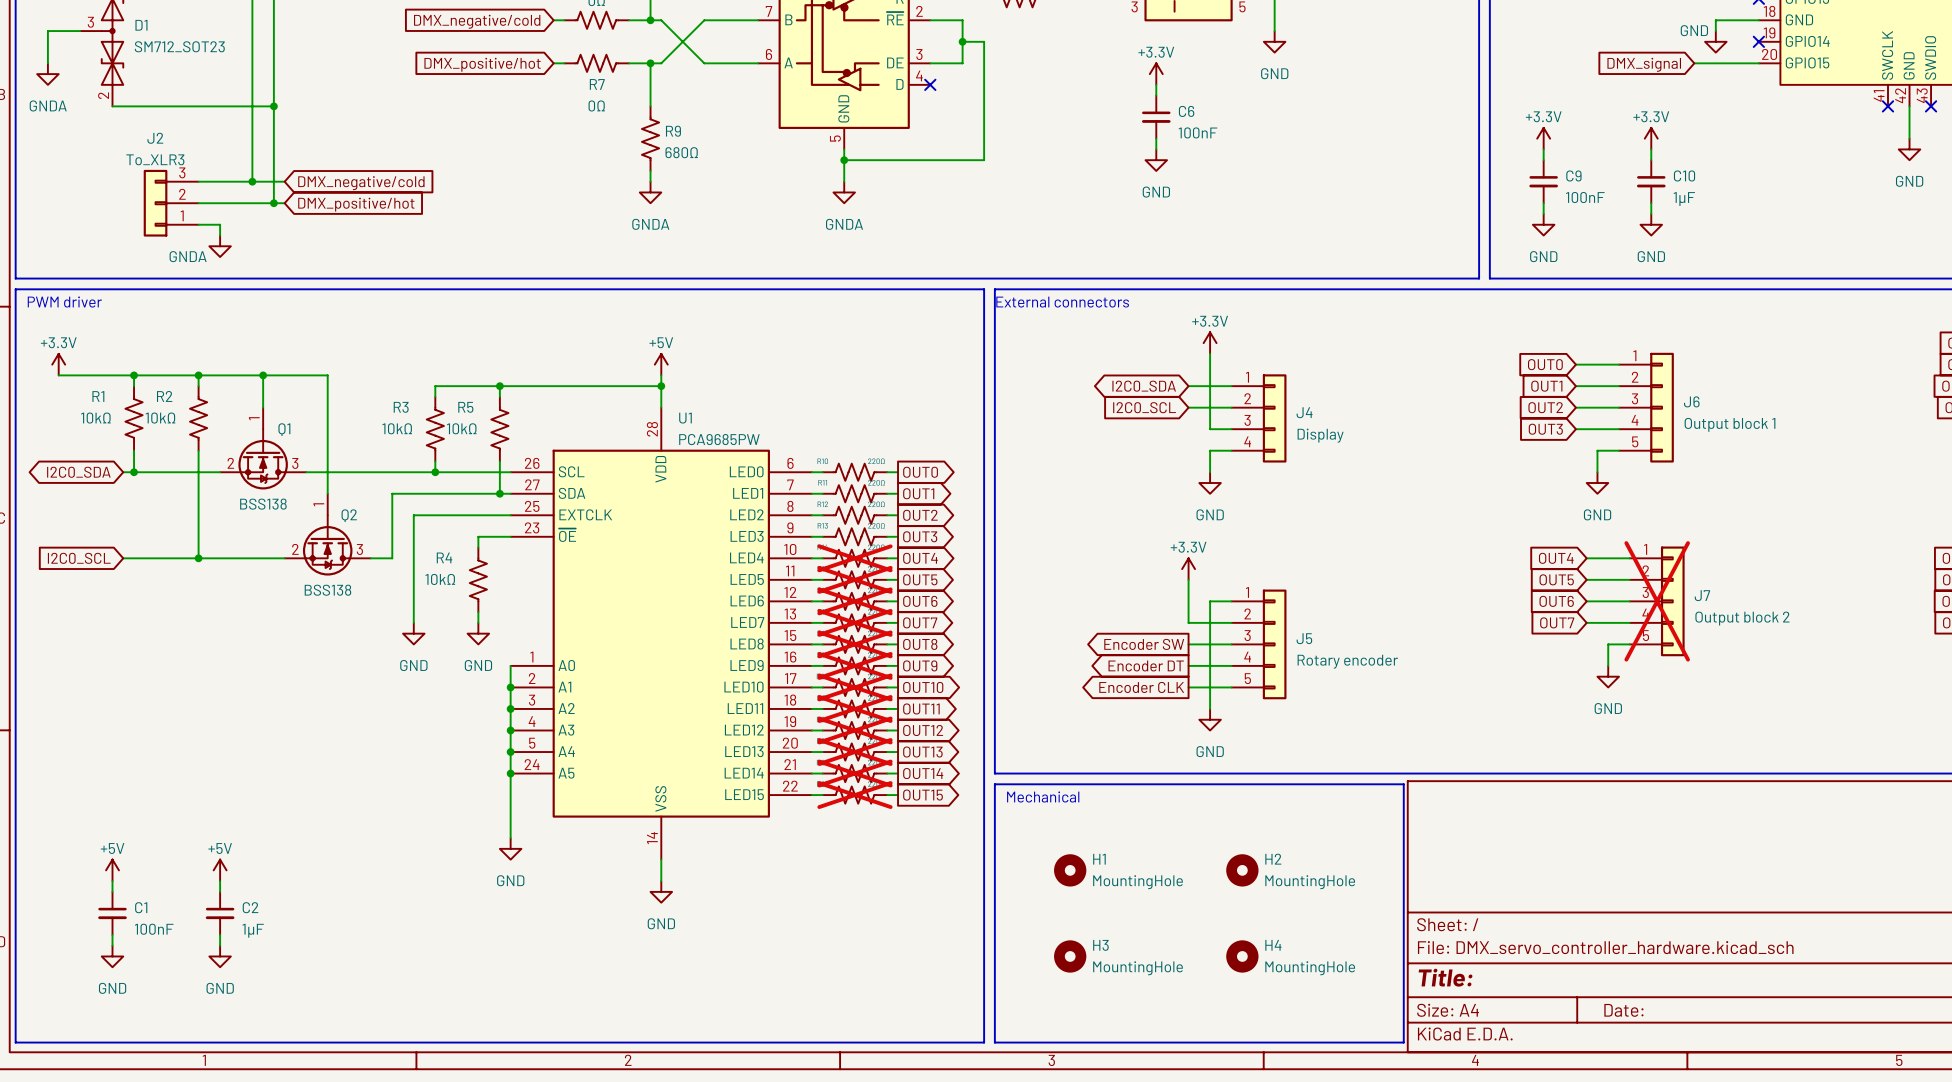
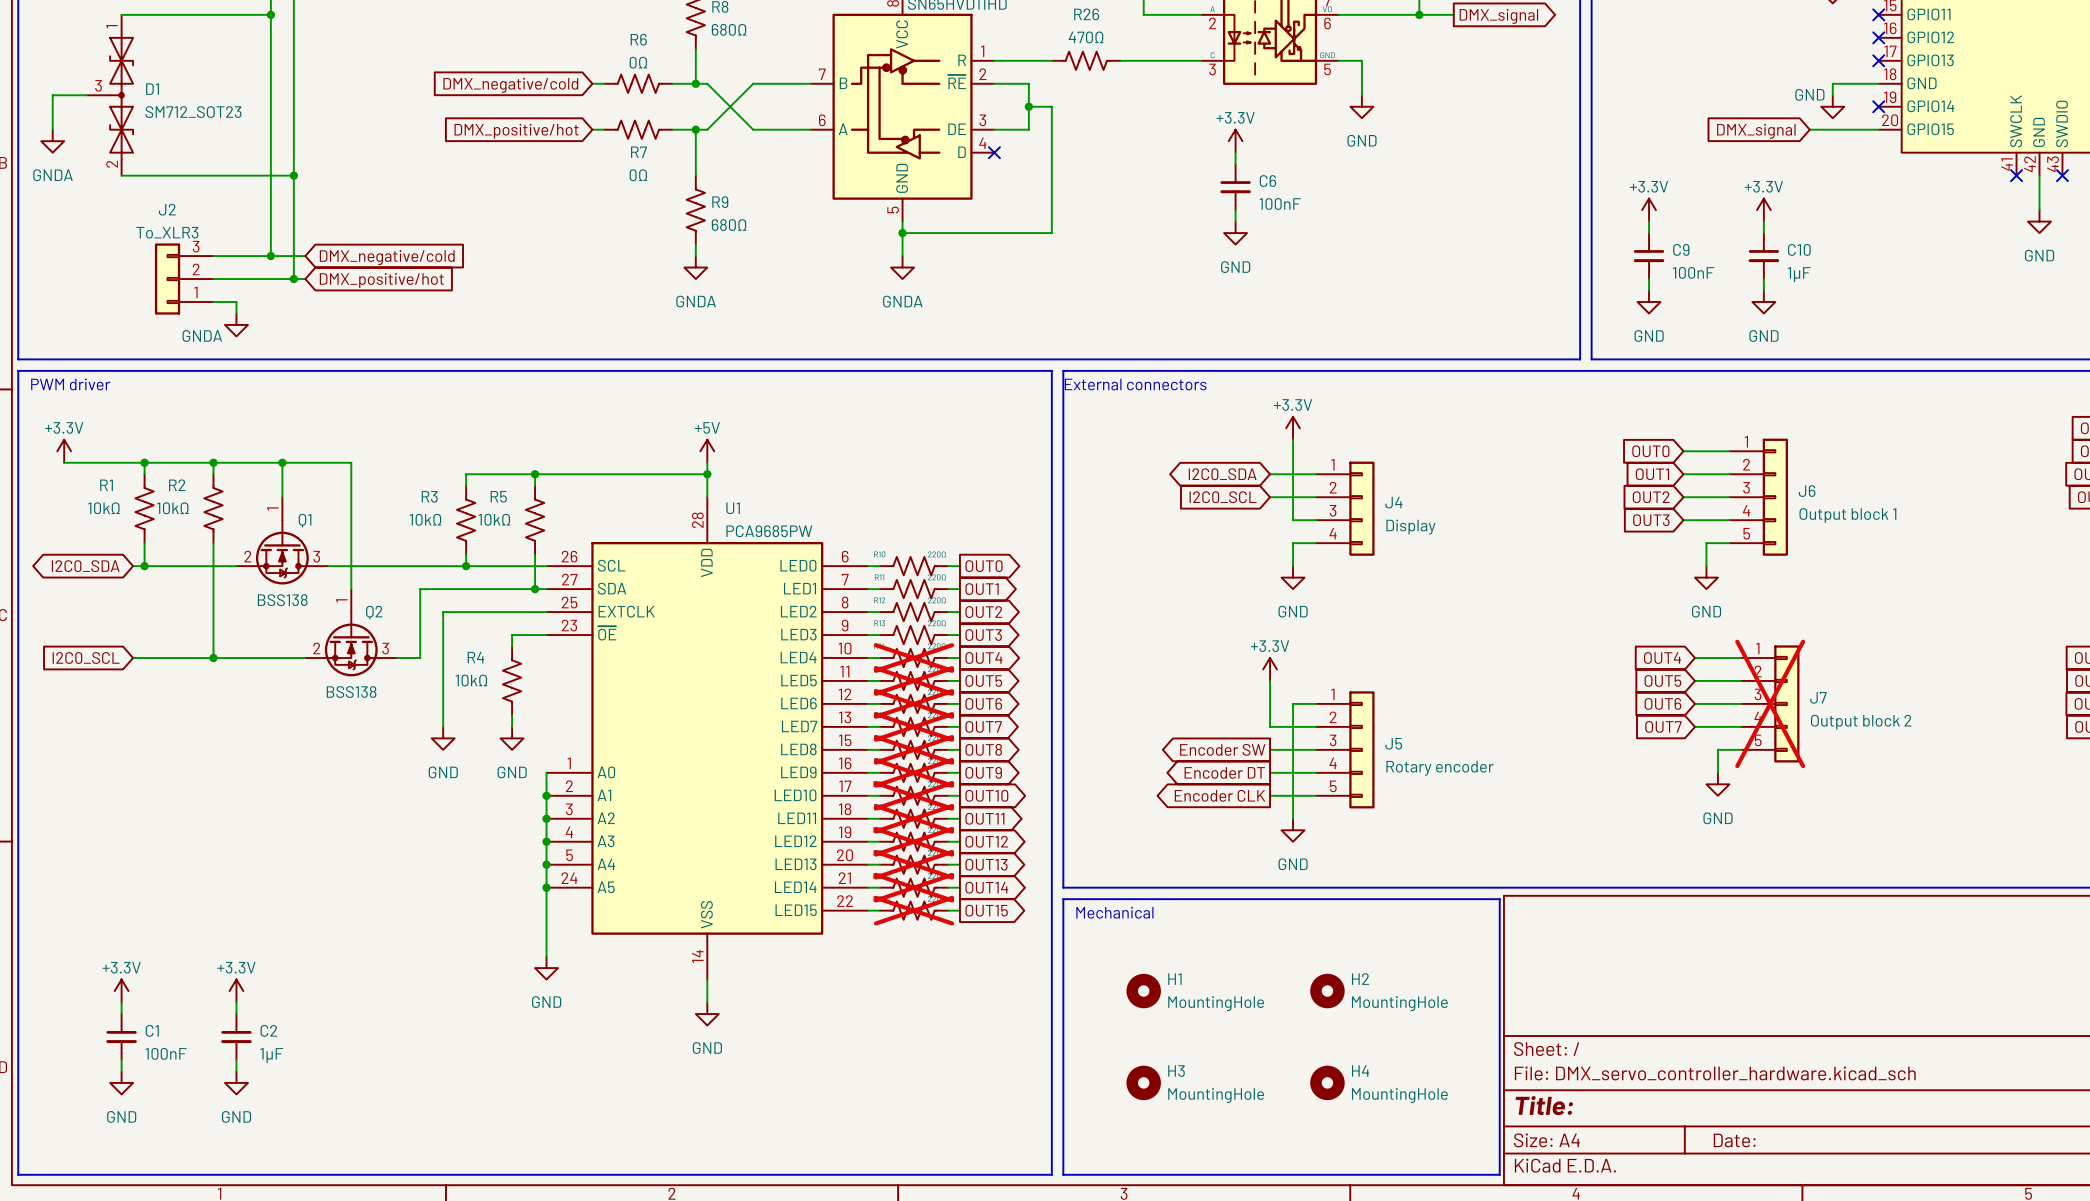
power symbol: +5V (112, 870) -> +3.3V (121, 991)
power symbol: +5V (220, 870) -> +3.3V (236, 991)

